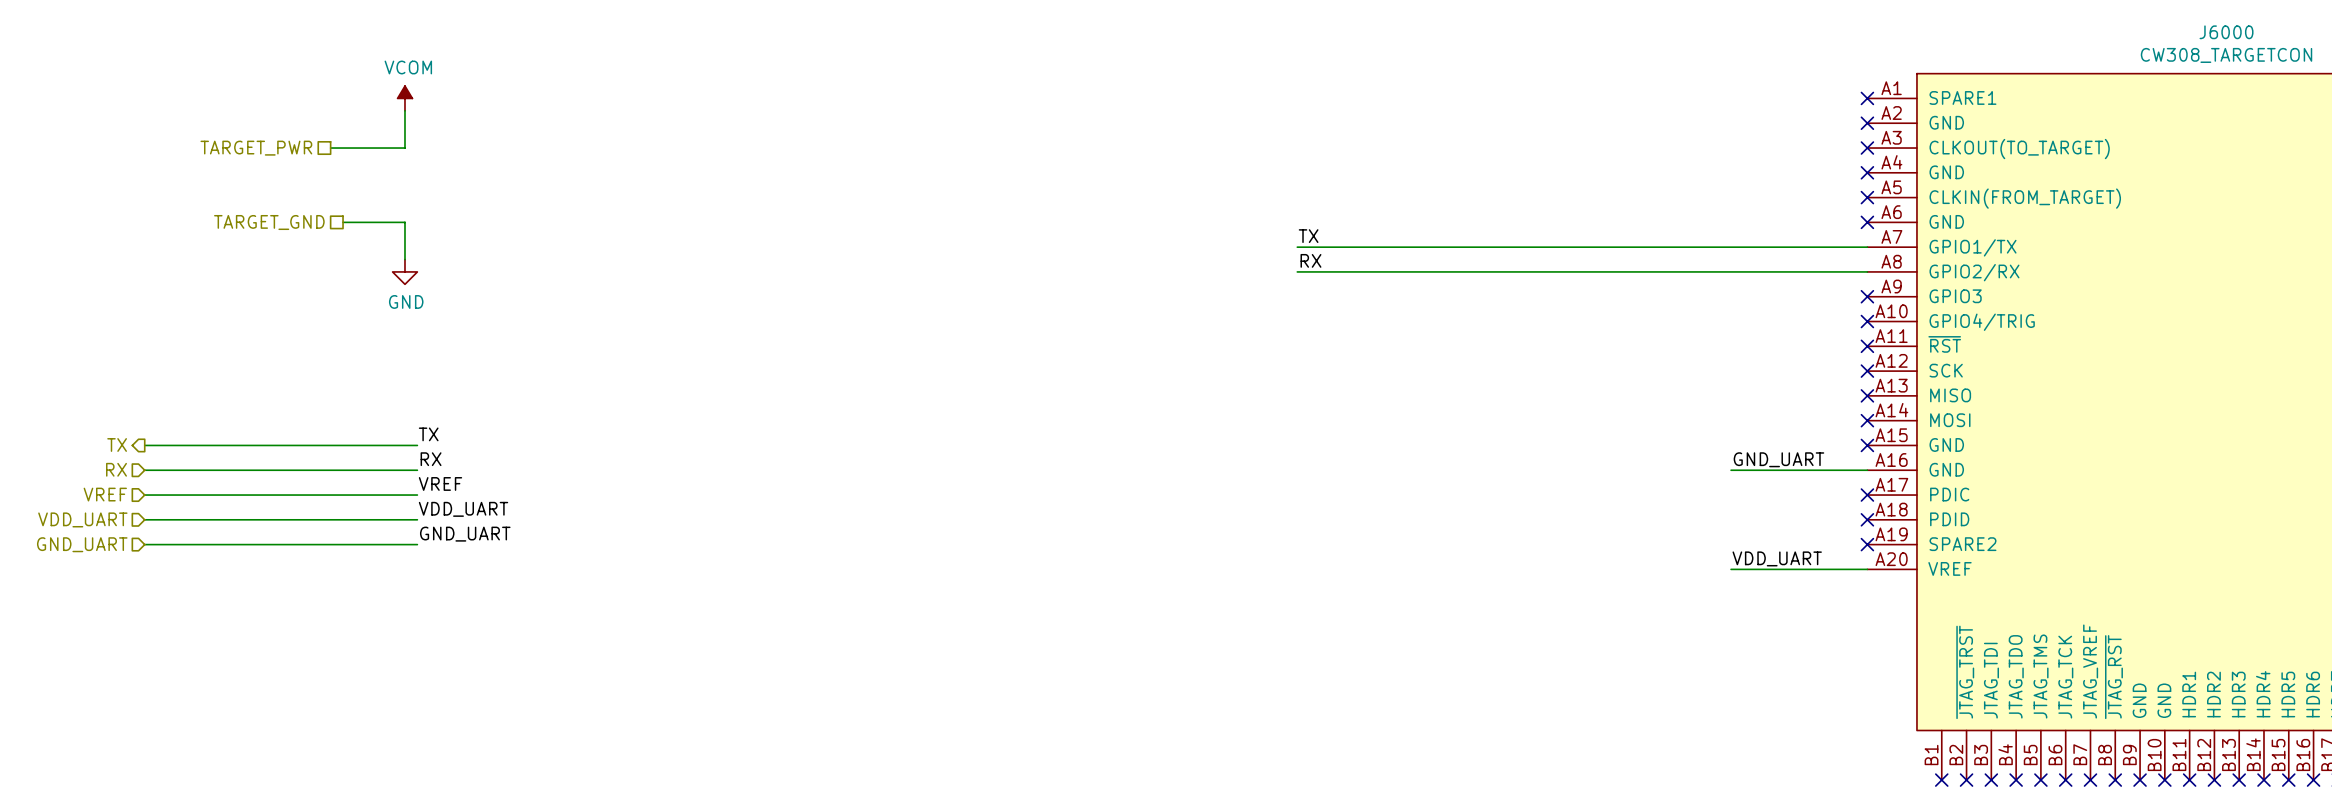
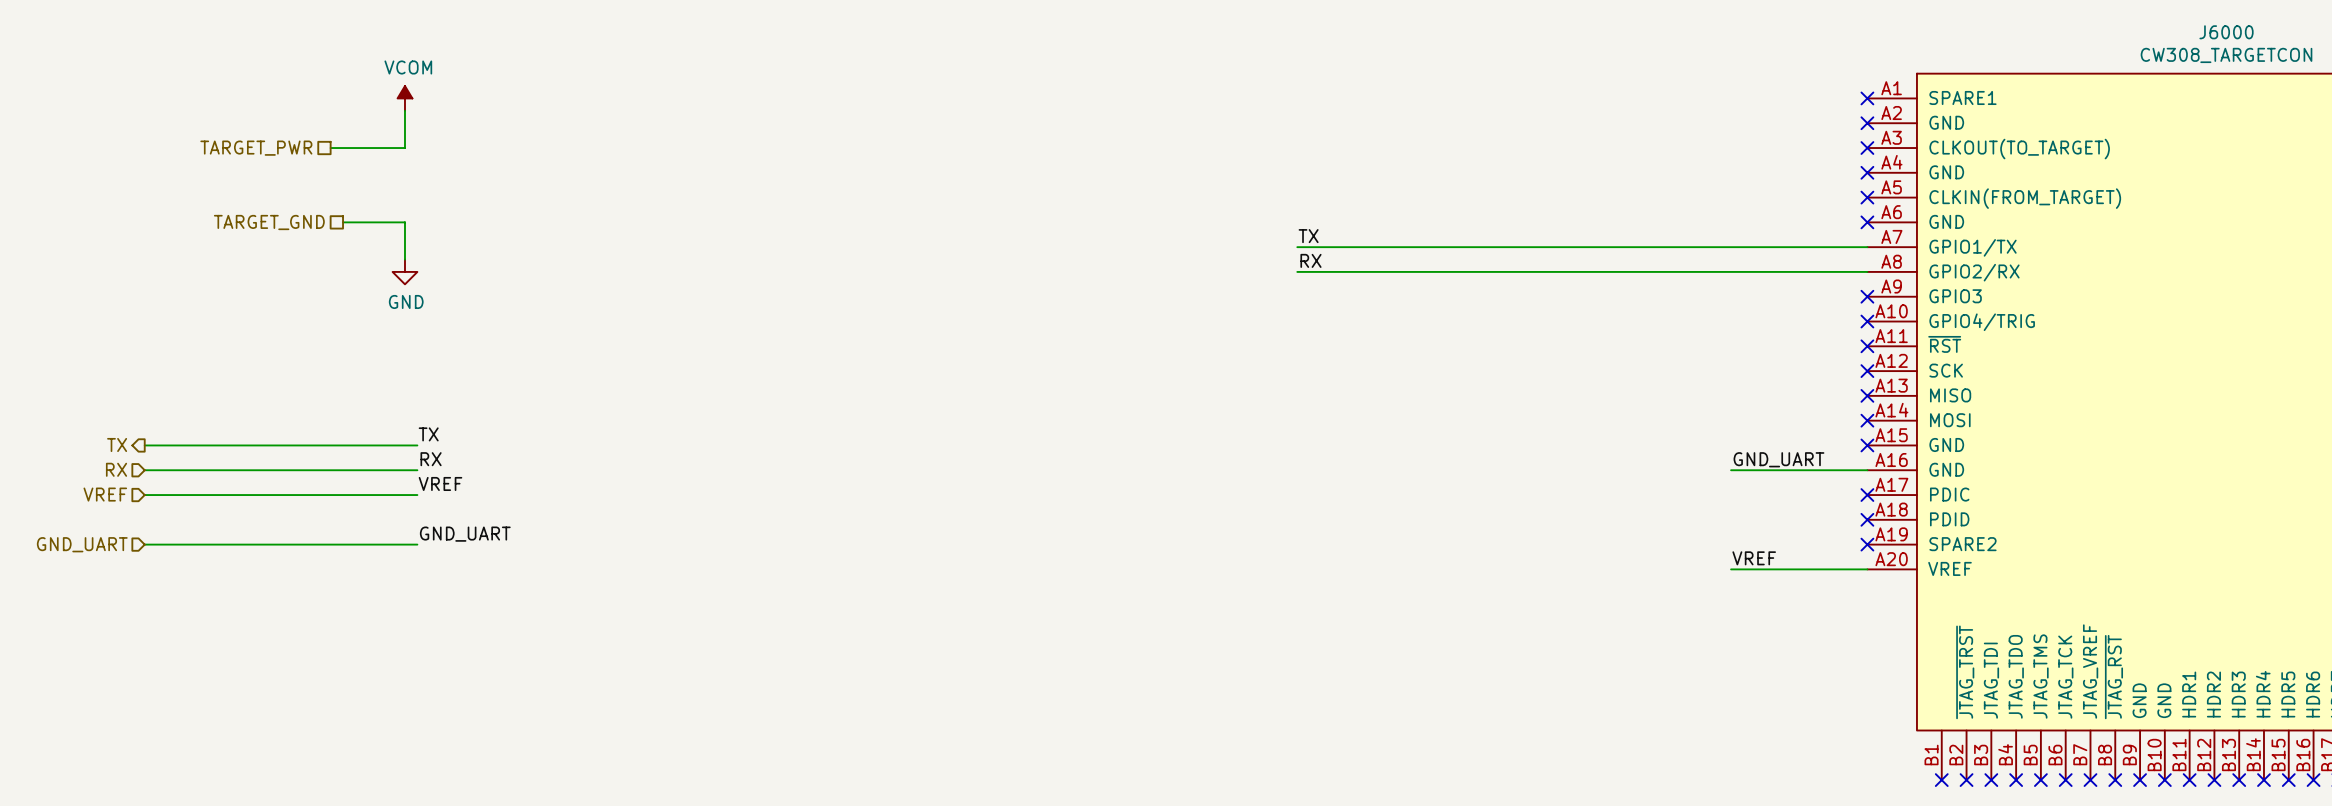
label: VDD_UART (463, 509) -> none
hierarchical label: VDD_UART (82, 519) -> none
wire: (144, 519) (417, 519) -> none
label: VDD_UART (1777, 558) -> VREF (1754, 558)

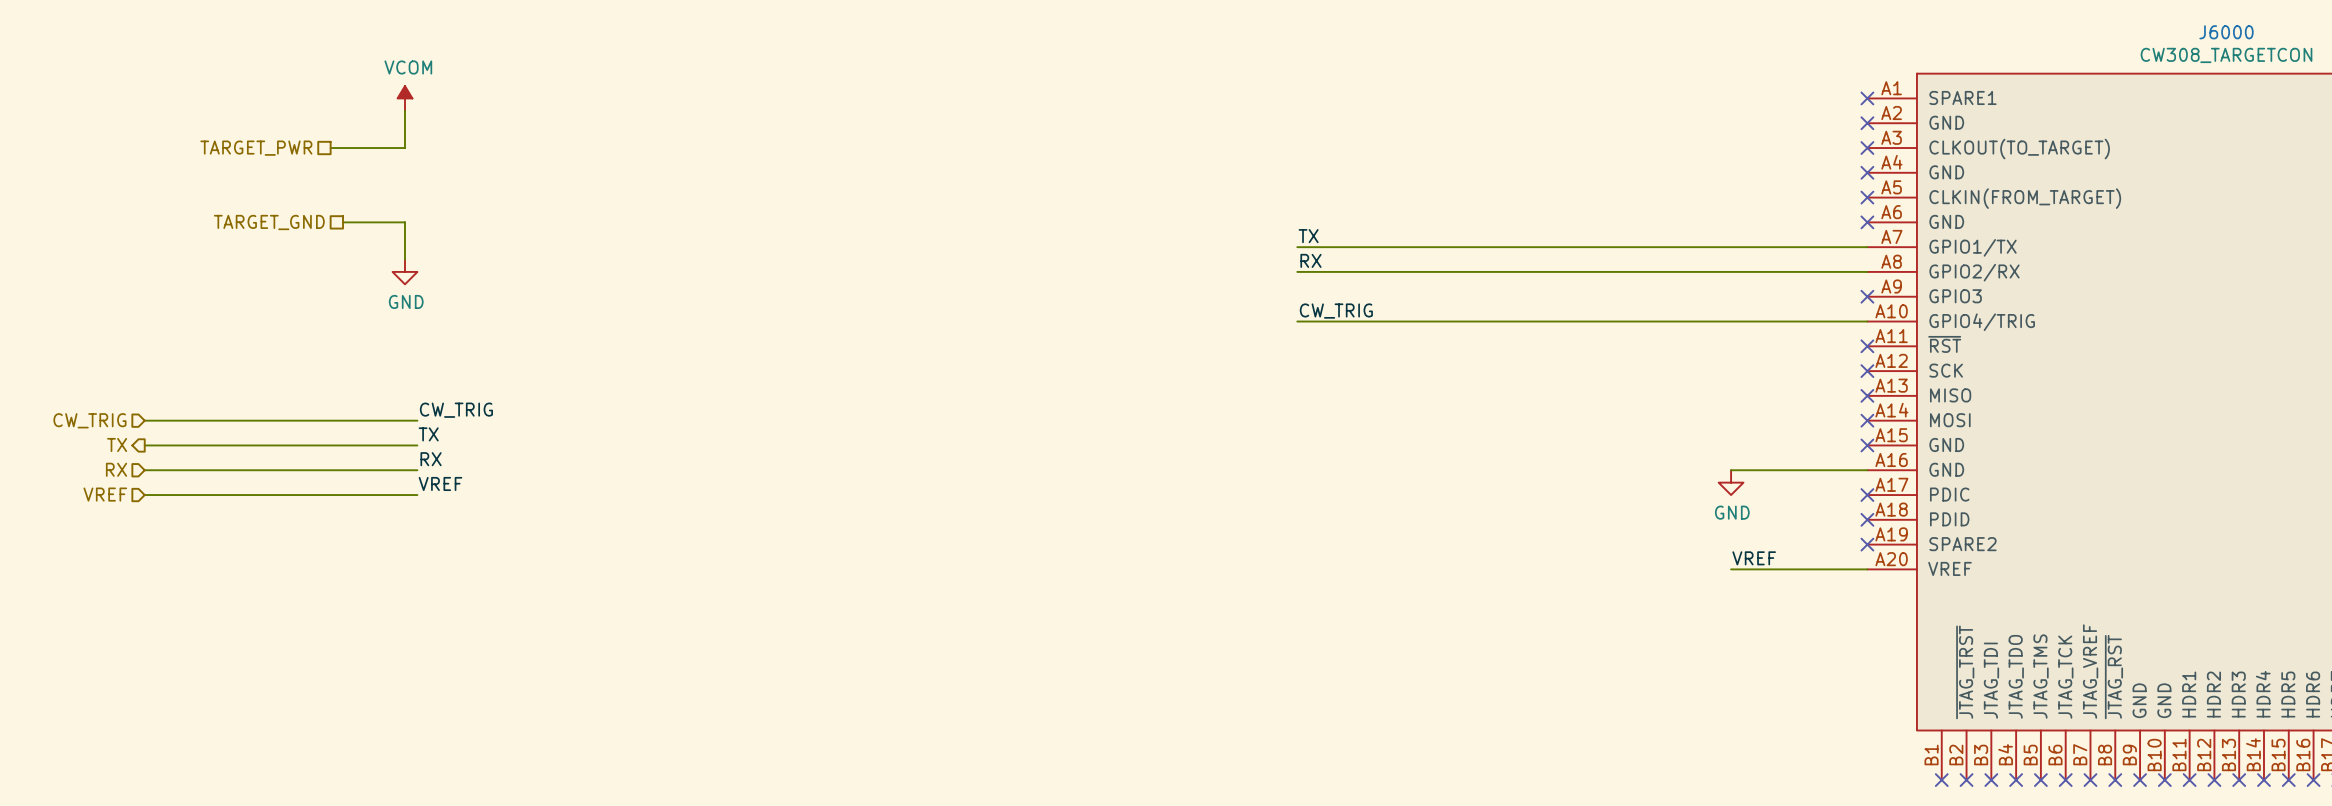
label: none -> CW_TRIG (1336, 311)
wire: none -> (1297, 321) (1867, 321)
no-connect mark: (1867, 321) -> none
label: none -> CW_TRIG (456, 410)
hierarchical label: none -> CW_TRIG (89, 420)
label: GND_UART (1778, 459) -> none
power symbol: none -> GND (1731, 482)
label: GND_UART (465, 534) -> none
hierarchical label: GND_UART (82, 544) -> none
wire: (144, 544) (417, 544) -> (144, 420) (417, 420)

